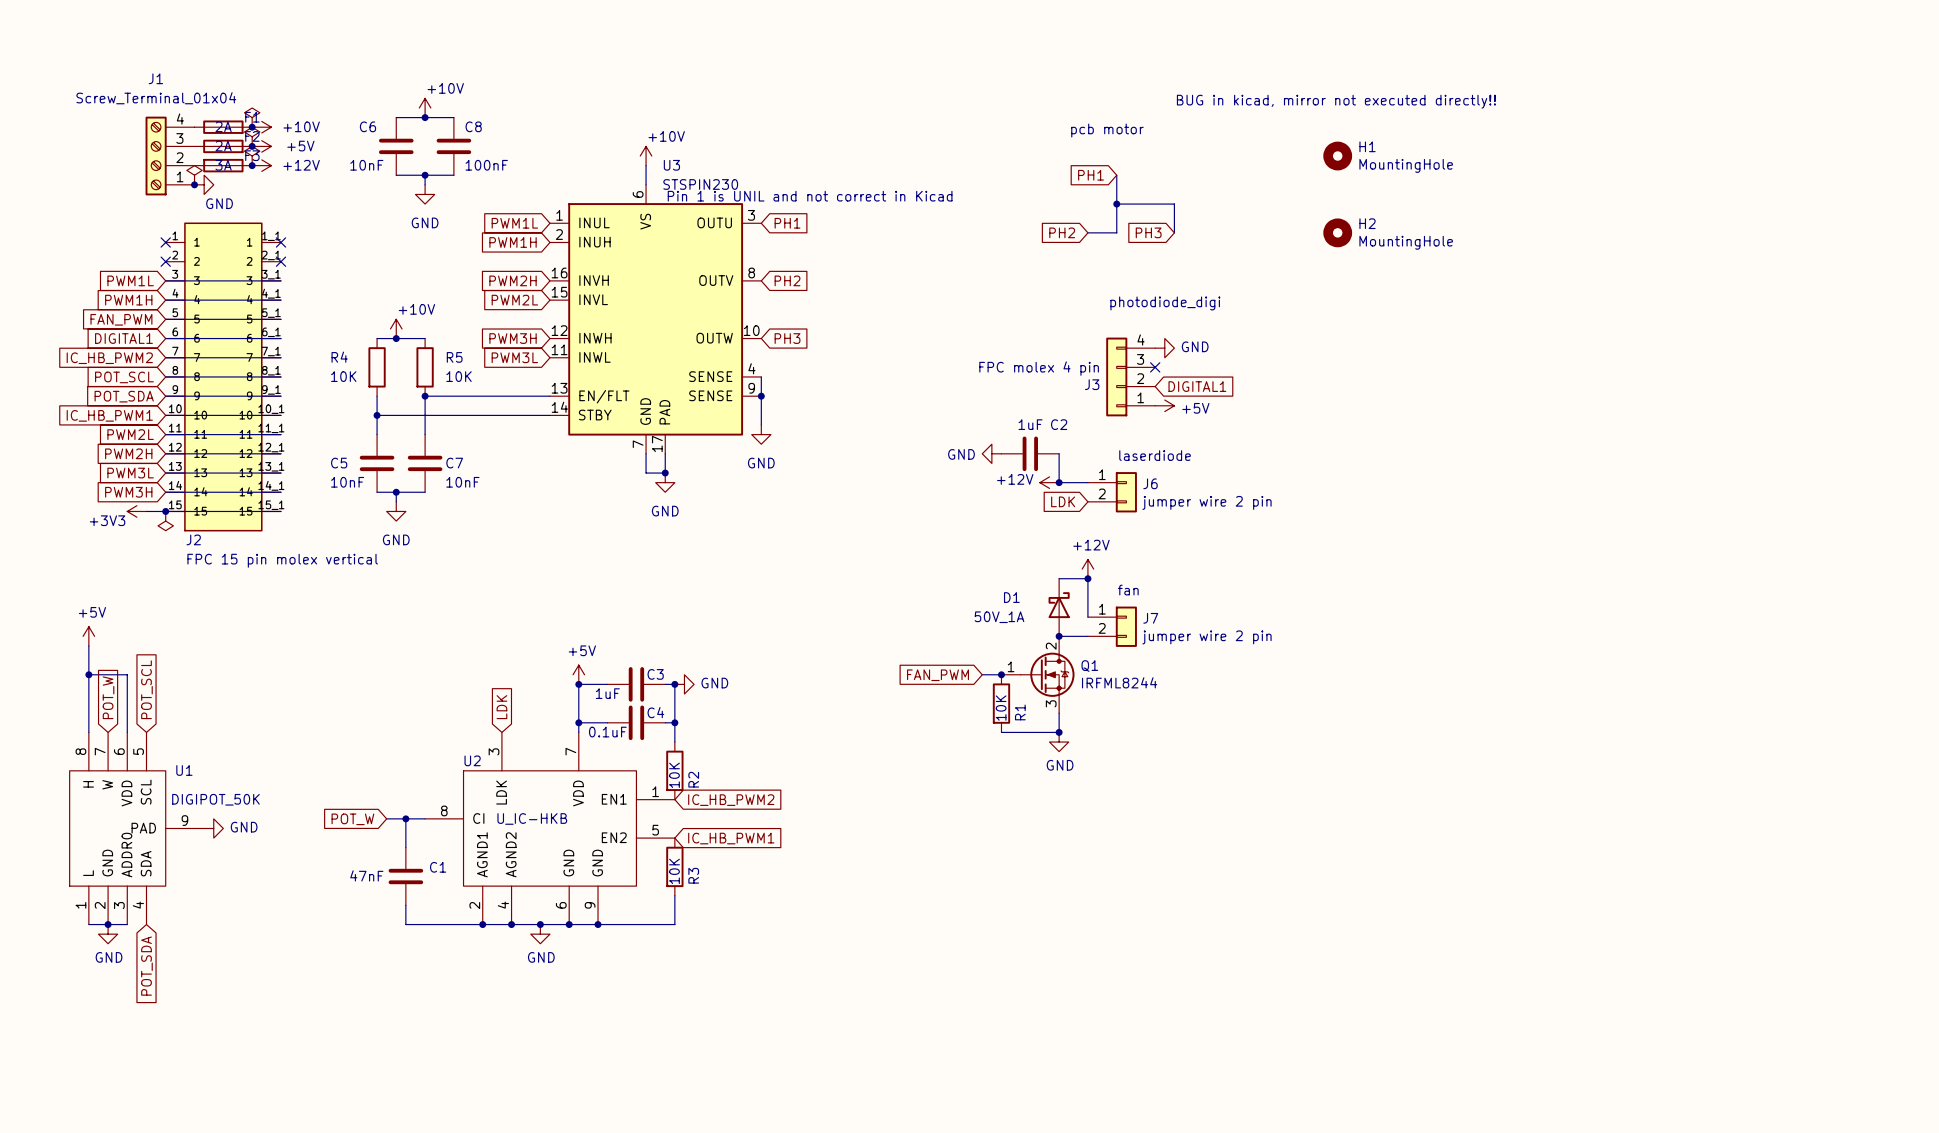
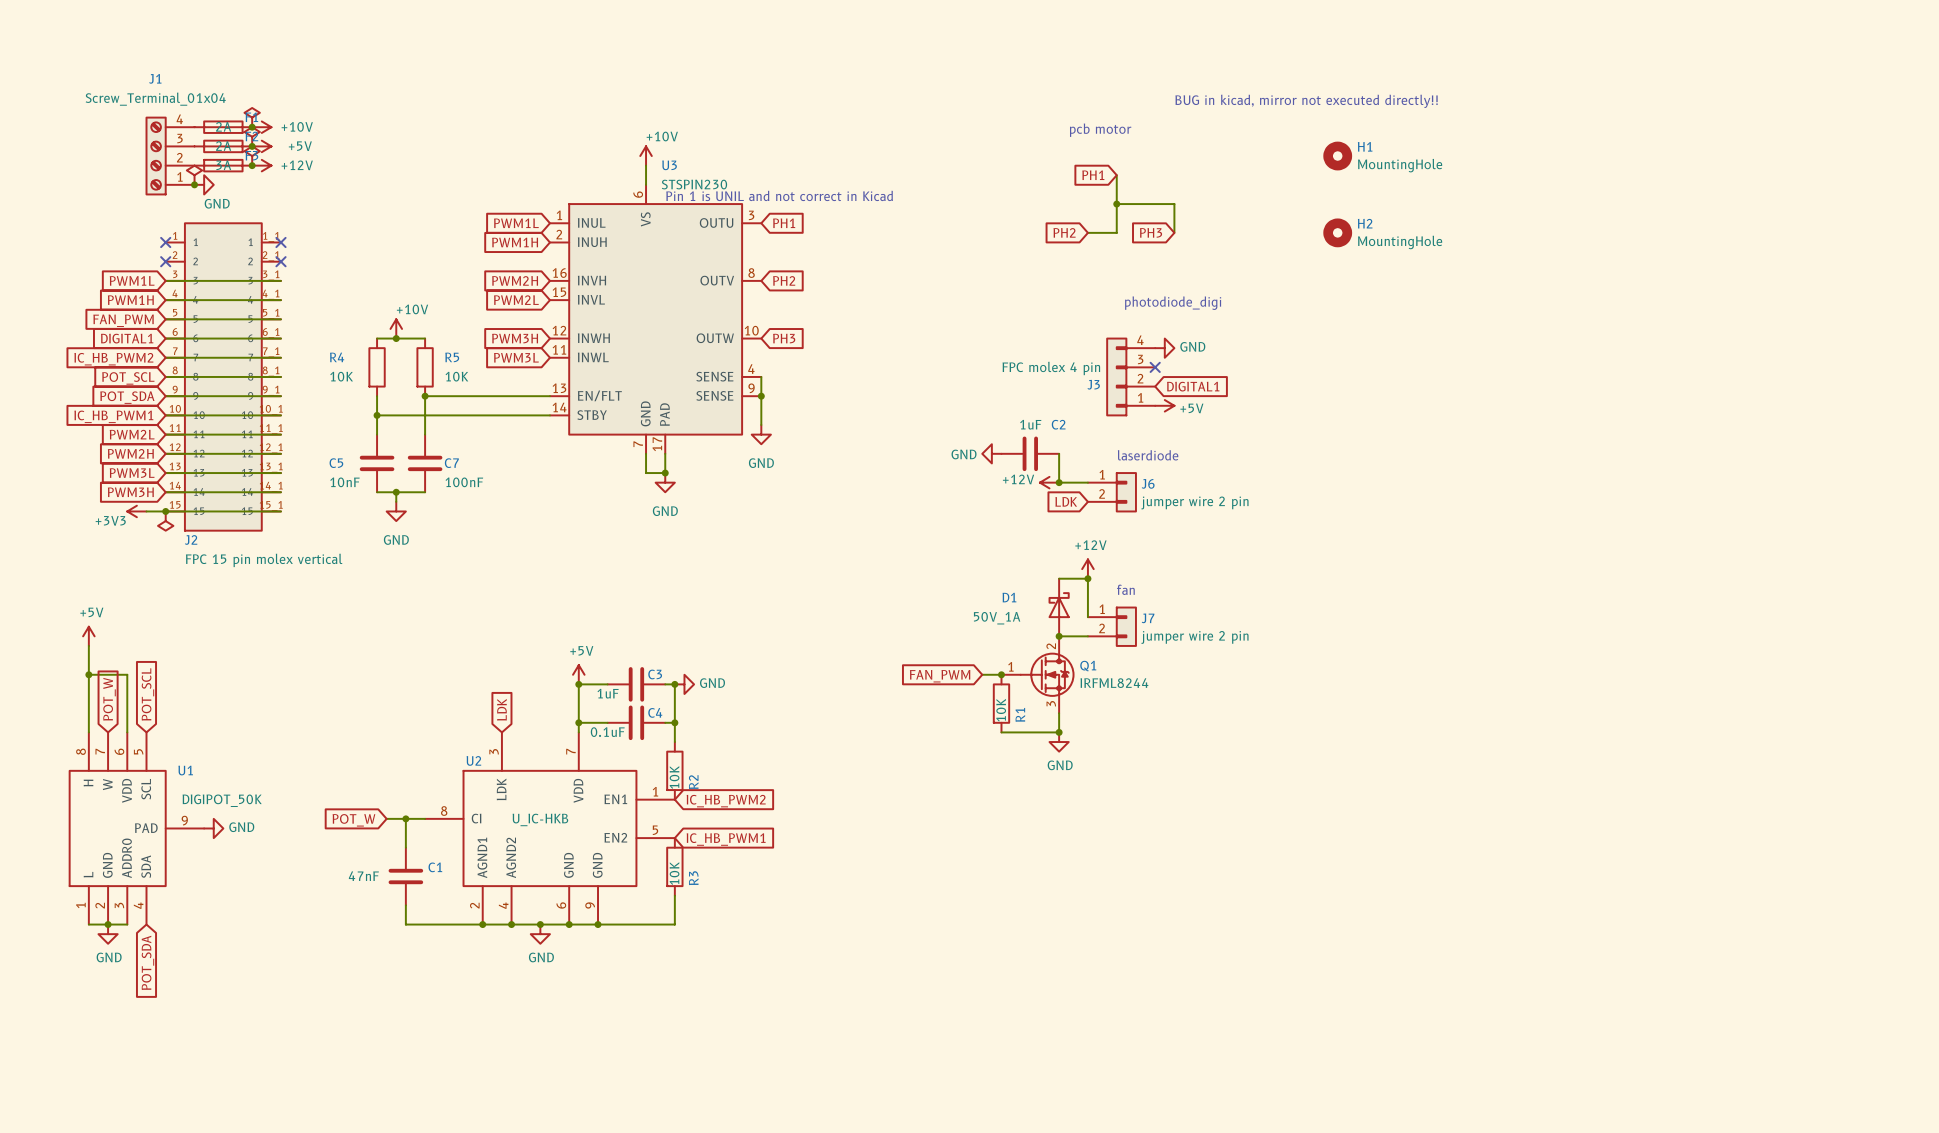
power symbol: +10V (425, 107) -> none
wire: (396, 117) (453, 117) -> none
junction: (425, 117) -> none
C6: 10nF (396, 146) -> none
C8: 100nF (453, 146) -> none
wire: (396, 175) (453, 175) -> none
wire: (425, 175) (425, 184) -> none
junction: (425, 175) -> none
power symbol: GND (425, 194) -> none
C7 value: 10nF (462, 482) -> 100nF (464, 482)

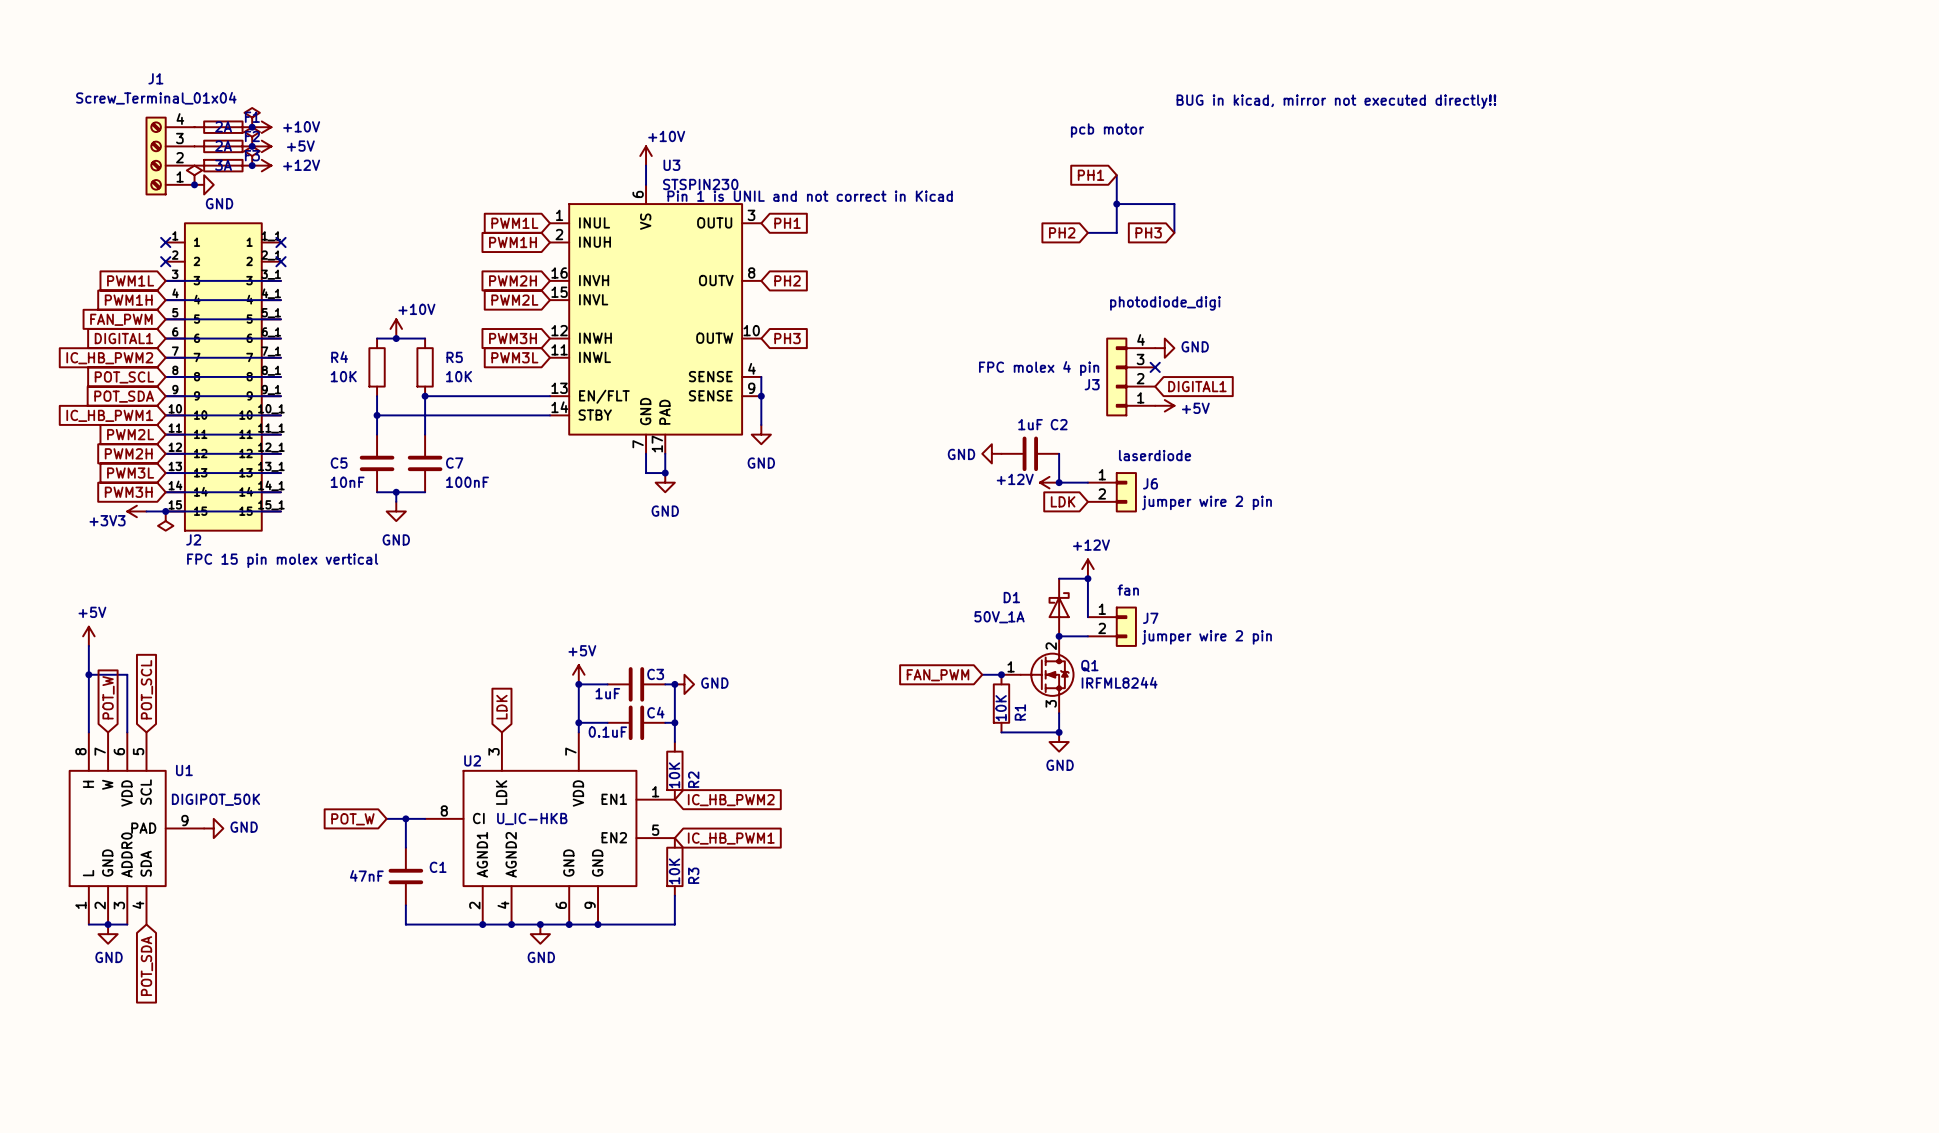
H1: MountingHole (1337, 156) -> none
H2: MountingHole (1337, 232) -> none

